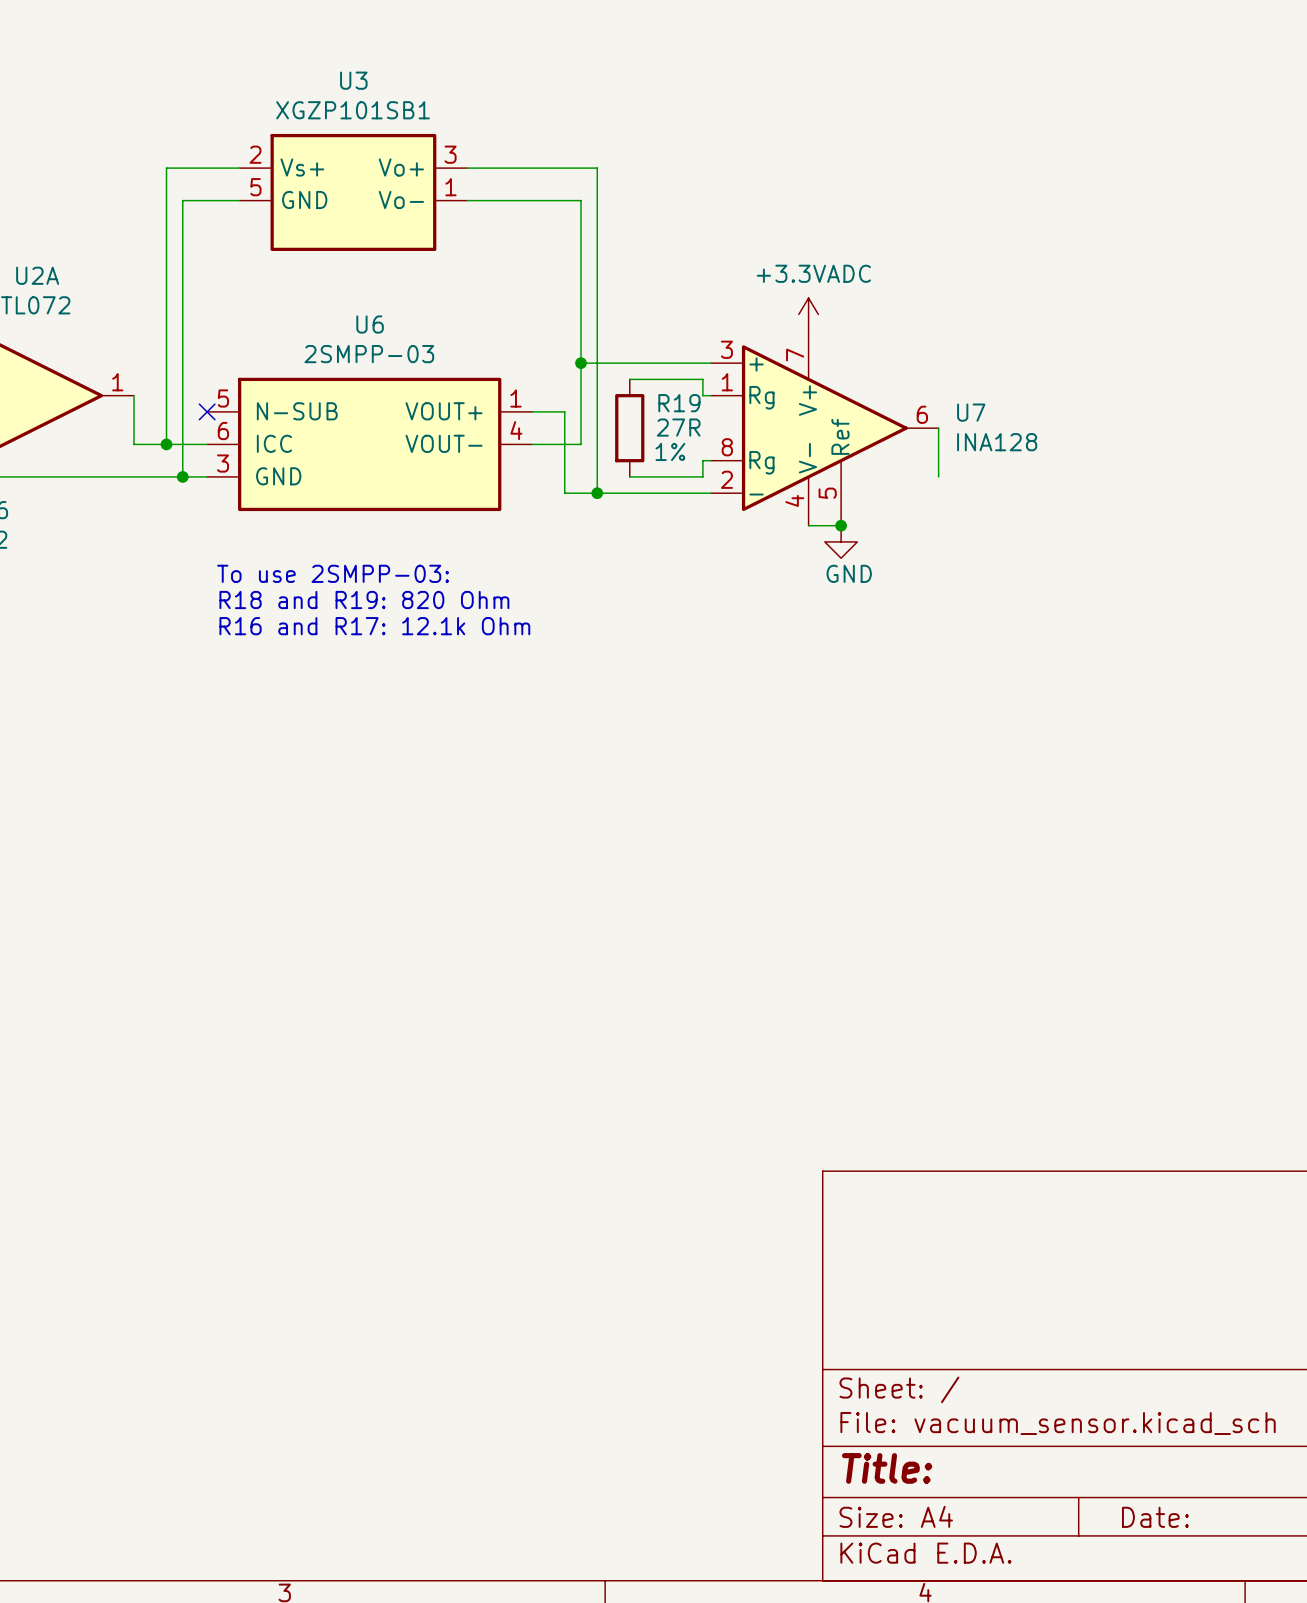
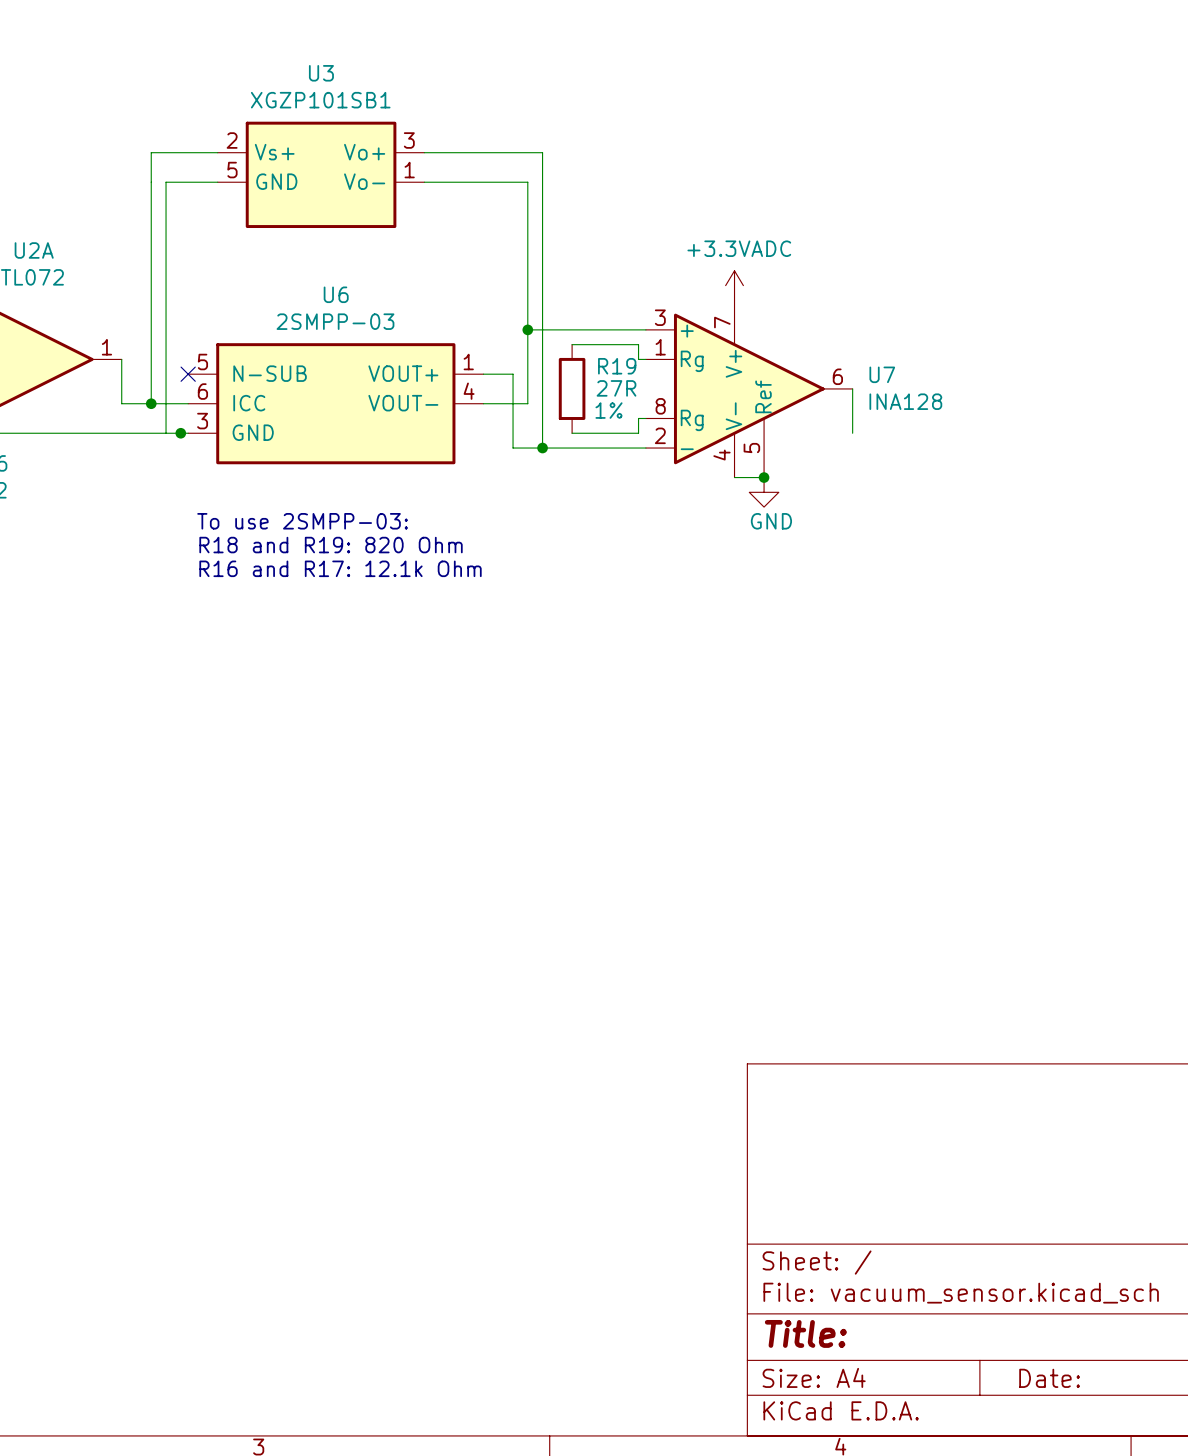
junction position: (182, 476) -> (180, 433)

